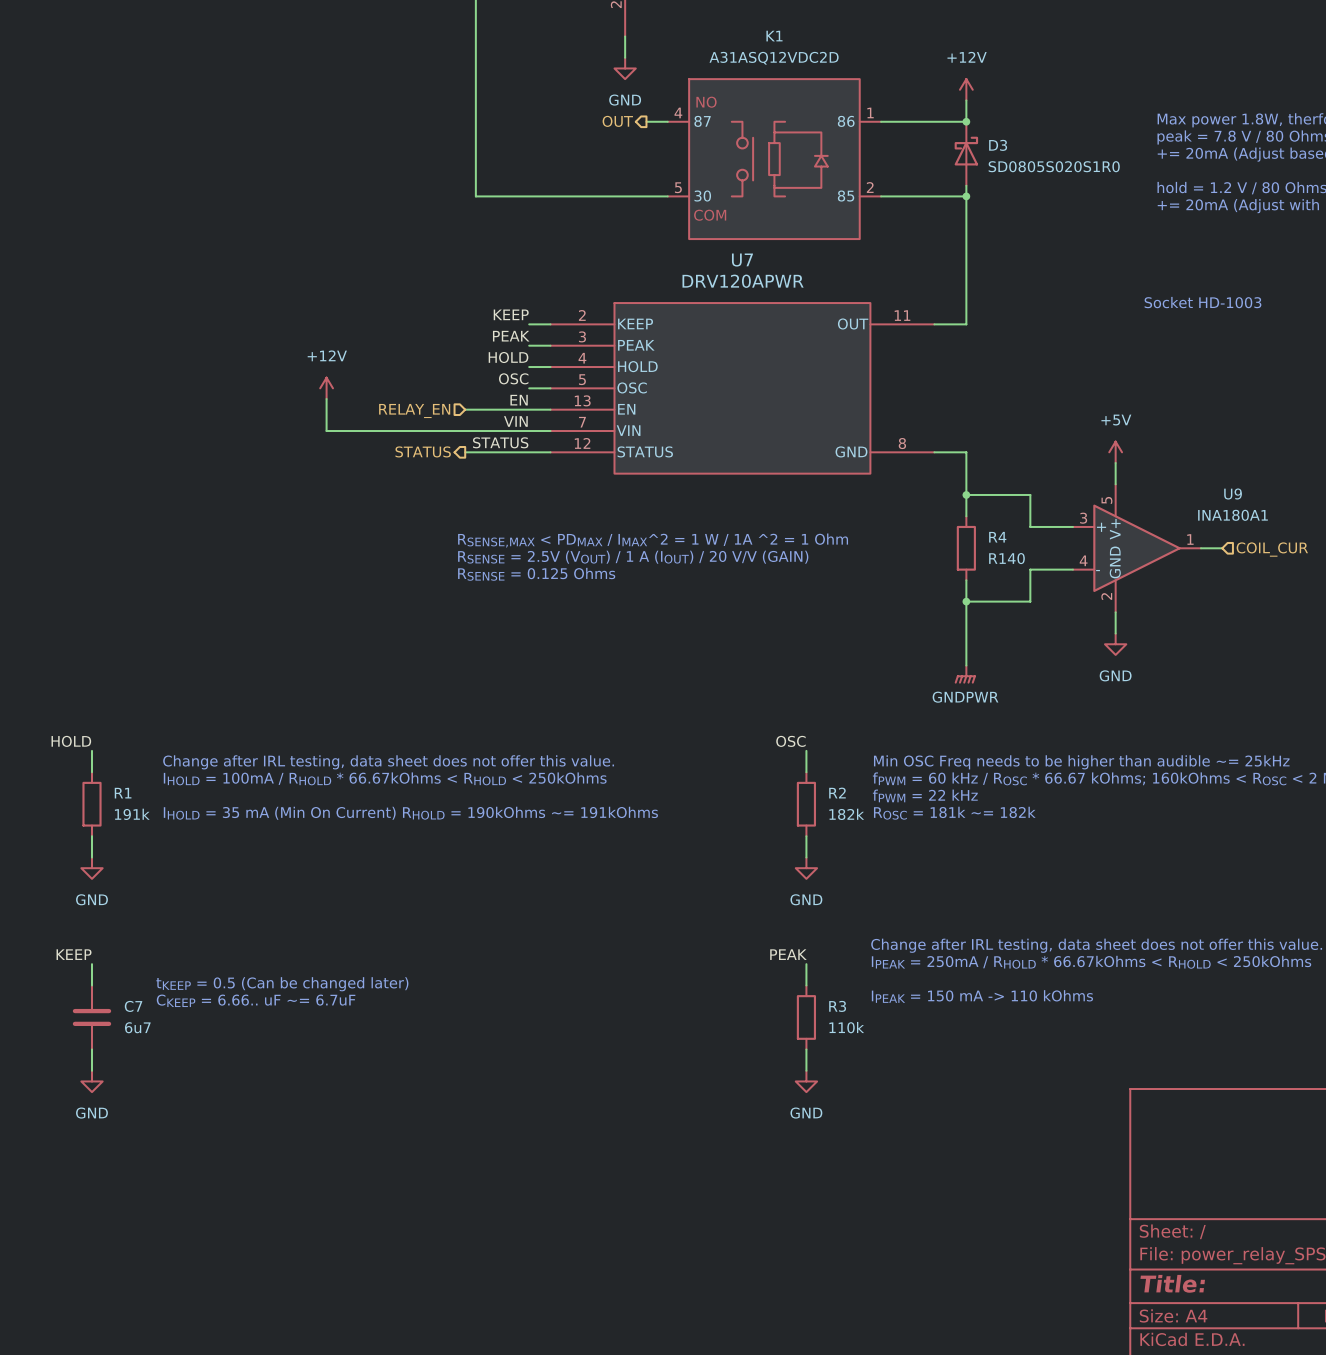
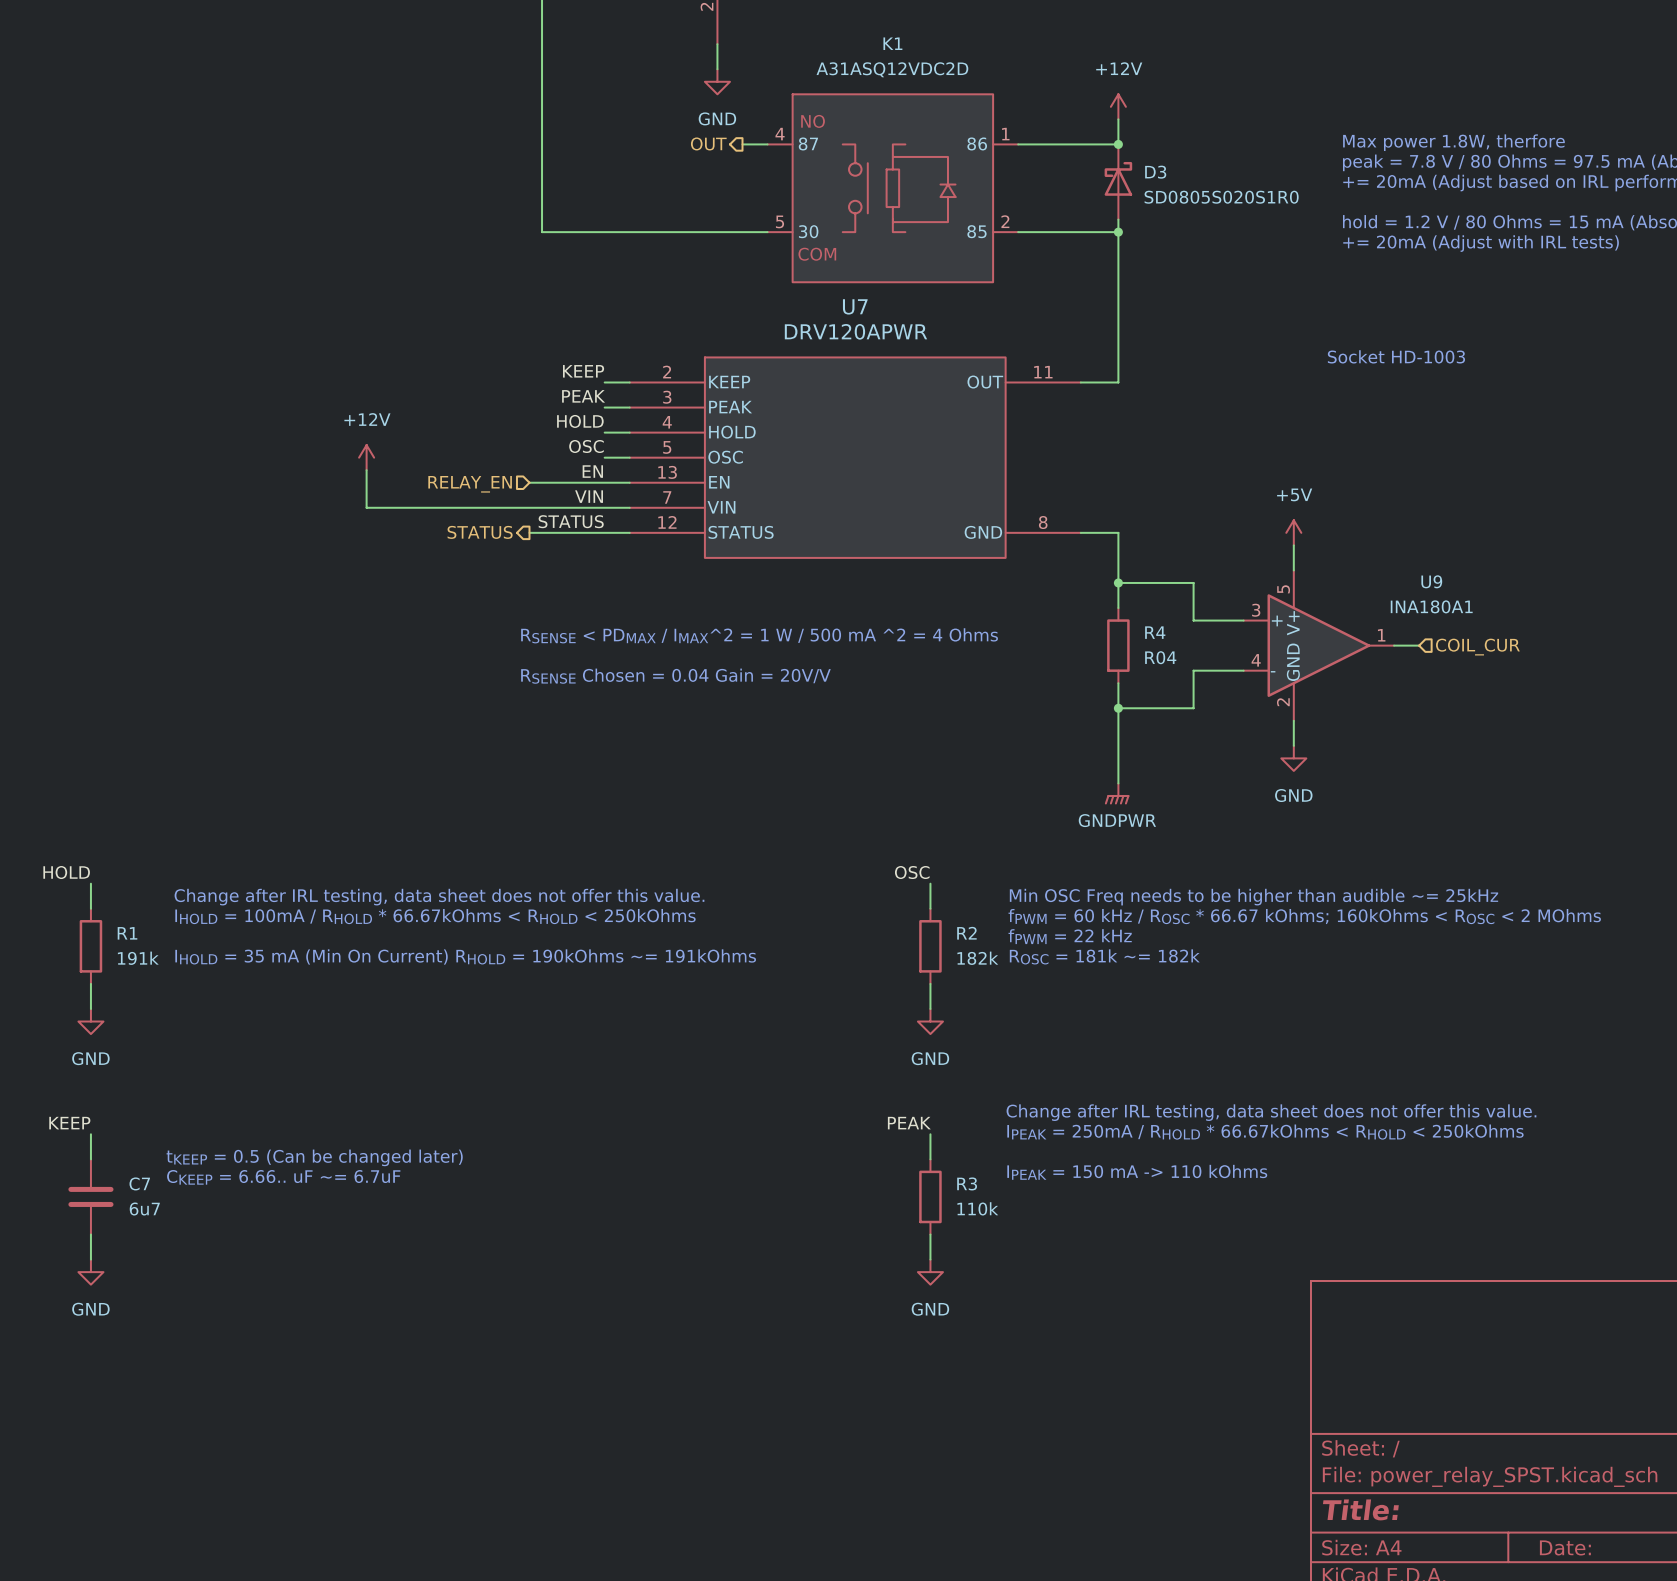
text: RSENSE,MAX < PDMAX / IMAX^2 = 1 W / 1A ^2 = 1 Ohm (653, 540) -> RSENSE < PDMAX / IMAX^2 = 1 W / 500 mA ^2 = 4 Ohms (759, 635)
text: RSENSE = 2.5V (VOUT) / 1 A (IOUT) / 20 V/V (GAIN) (633, 557) -> none
R4 value: R140 (1006, 558) -> R04 (1160, 657)
text: RSENSE = 0.125 Ohms (536, 574) -> RSENSE Chosen = 0.04 Gain = 20V/V (675, 676)

